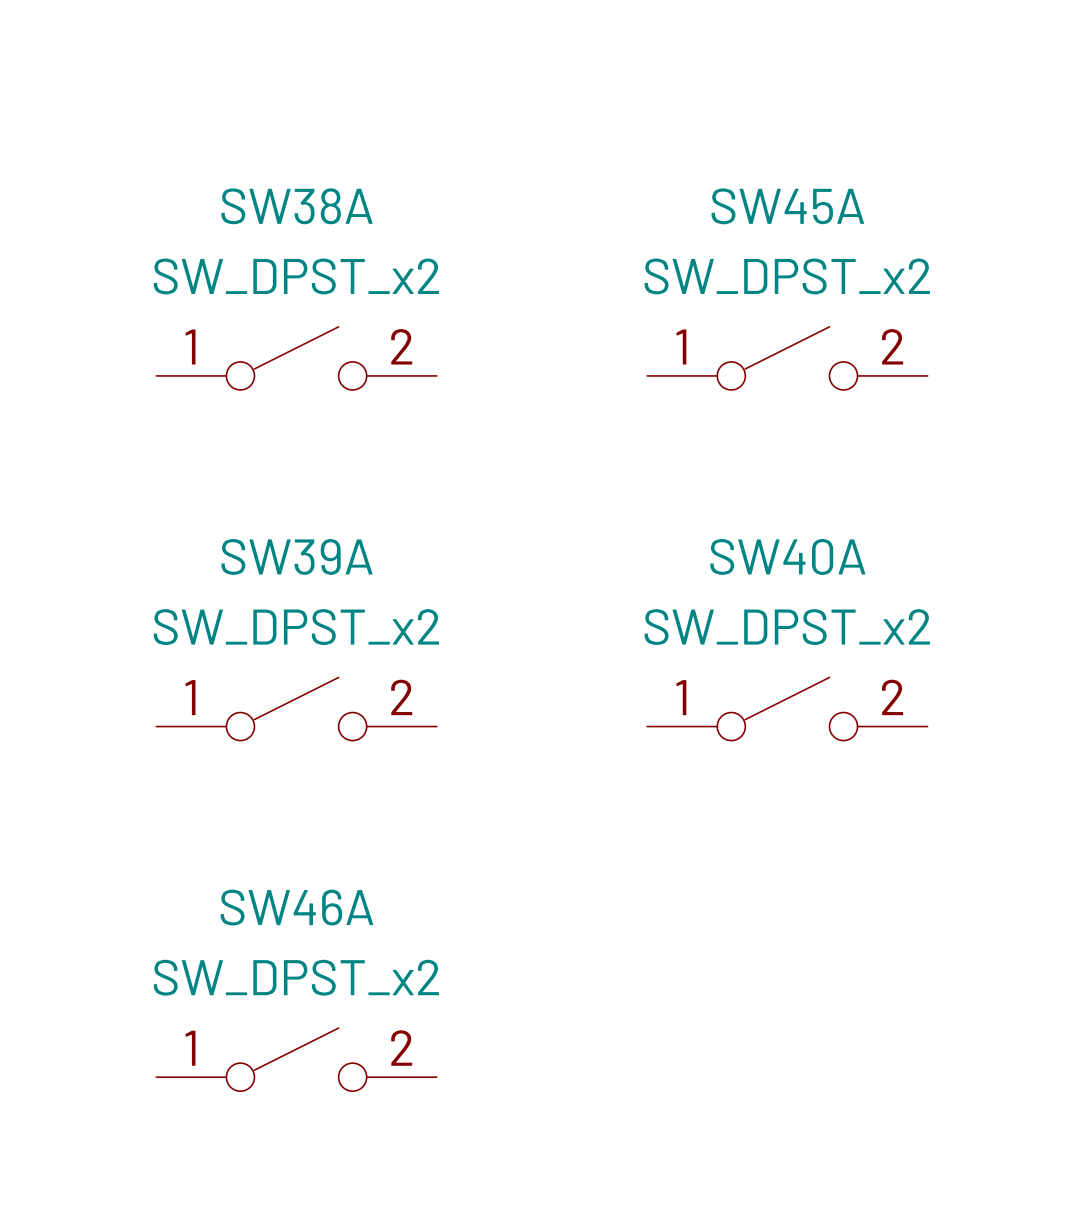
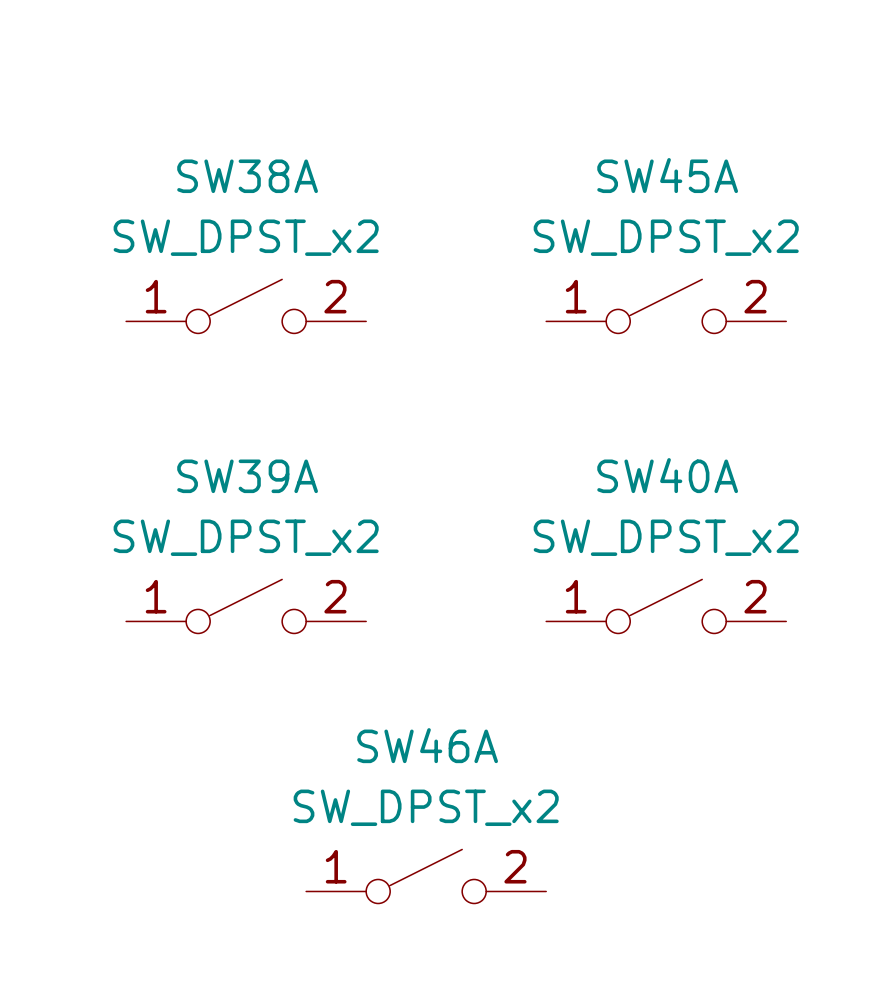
SW46A position: (296, 1059) -> (426, 876)

